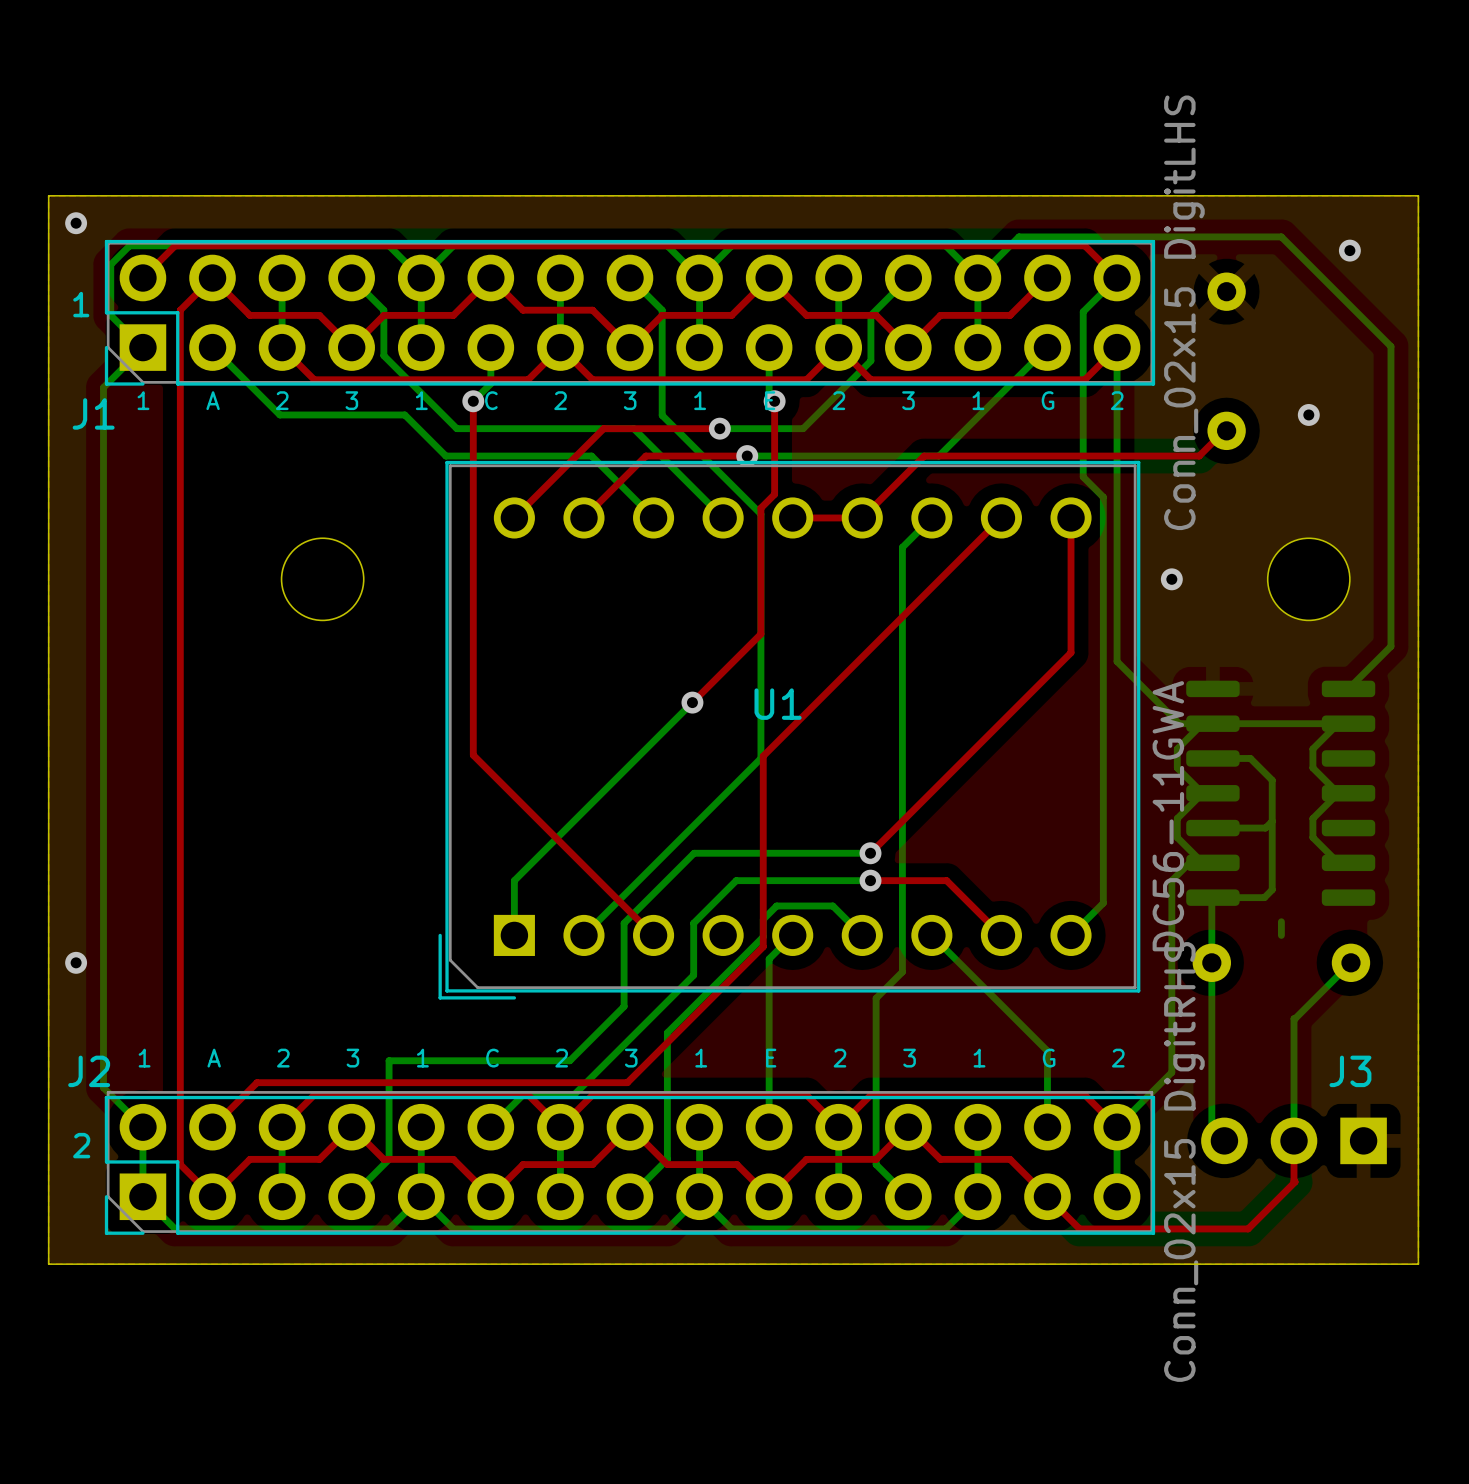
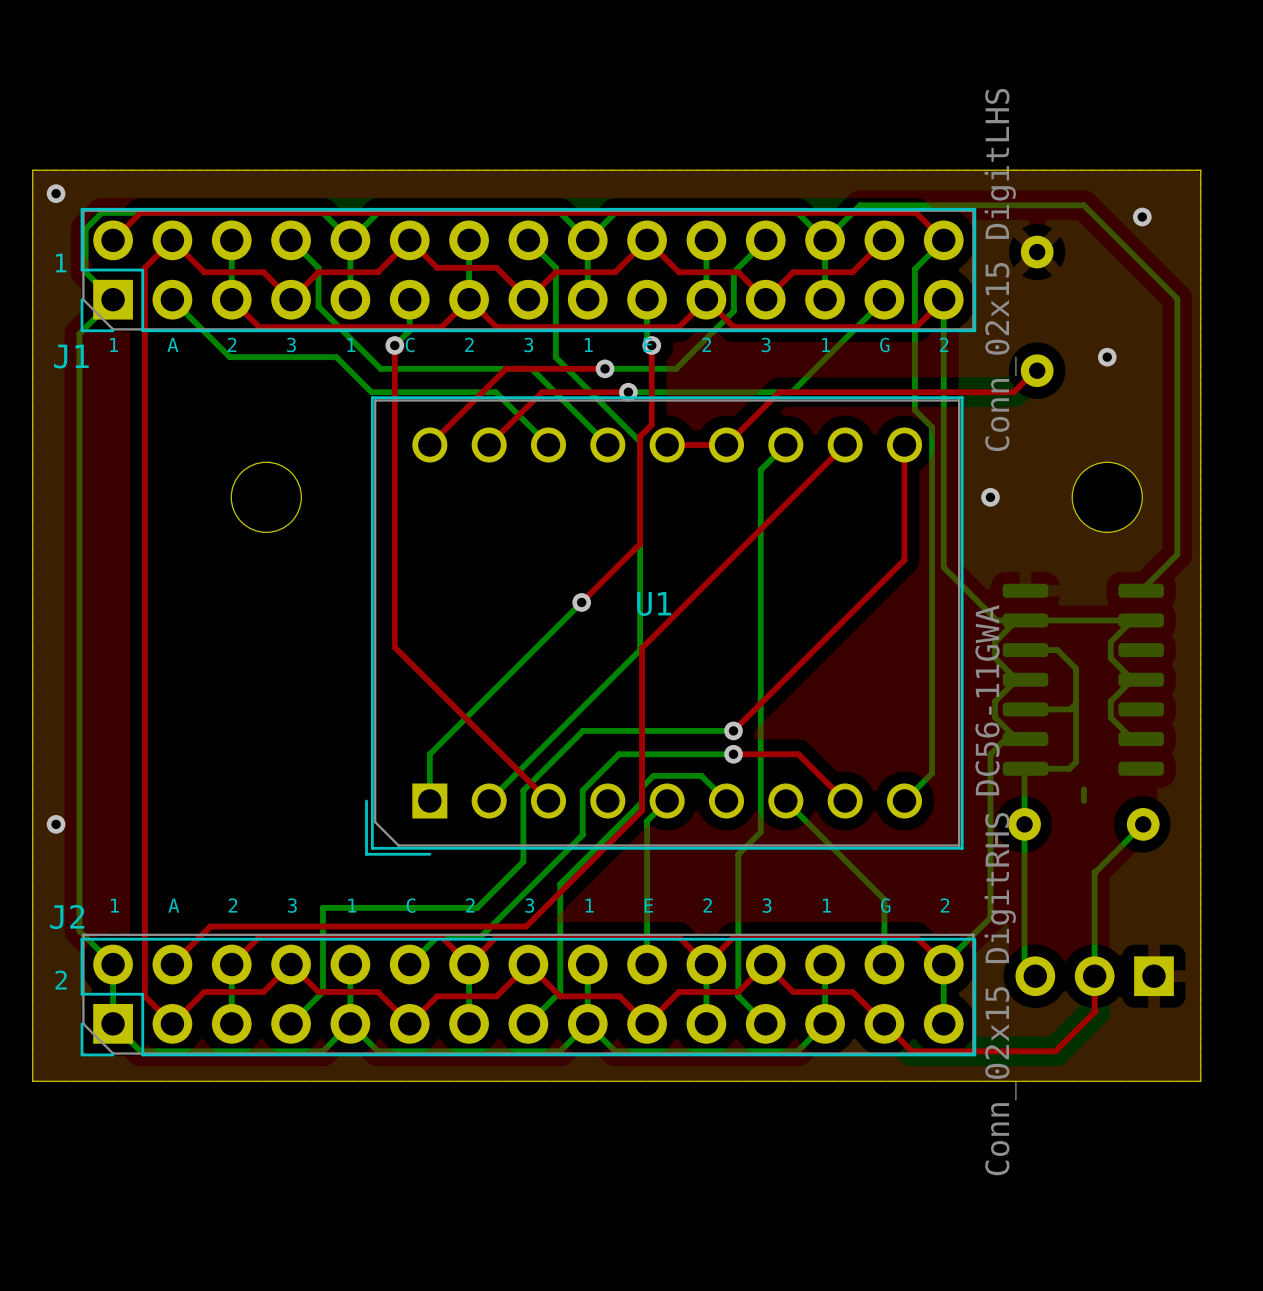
J3 name: J3 (1350, 1071) -> none

